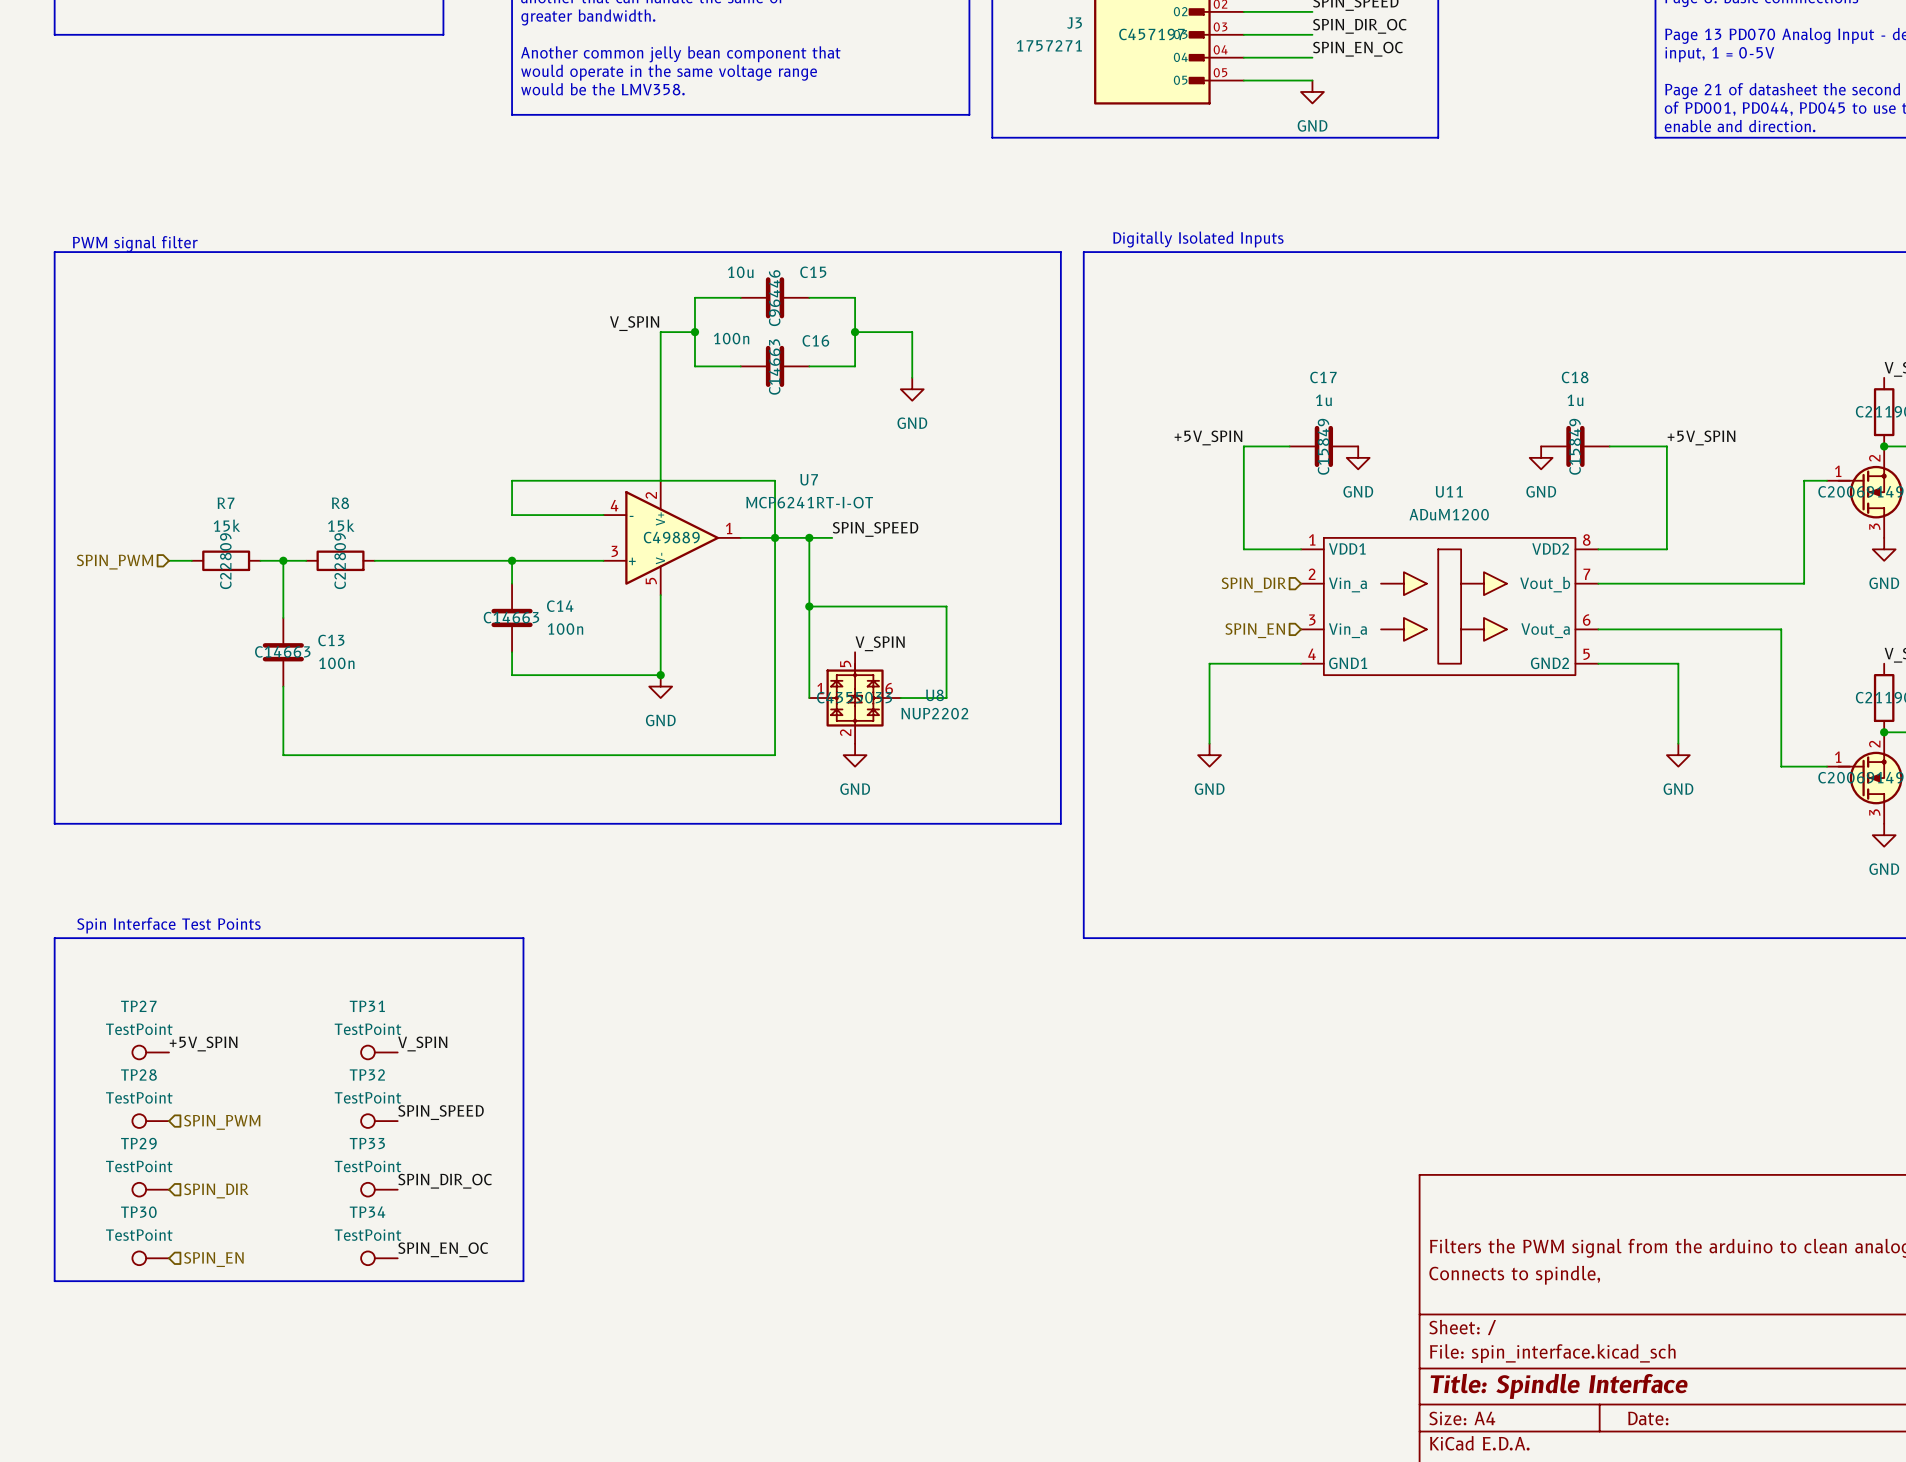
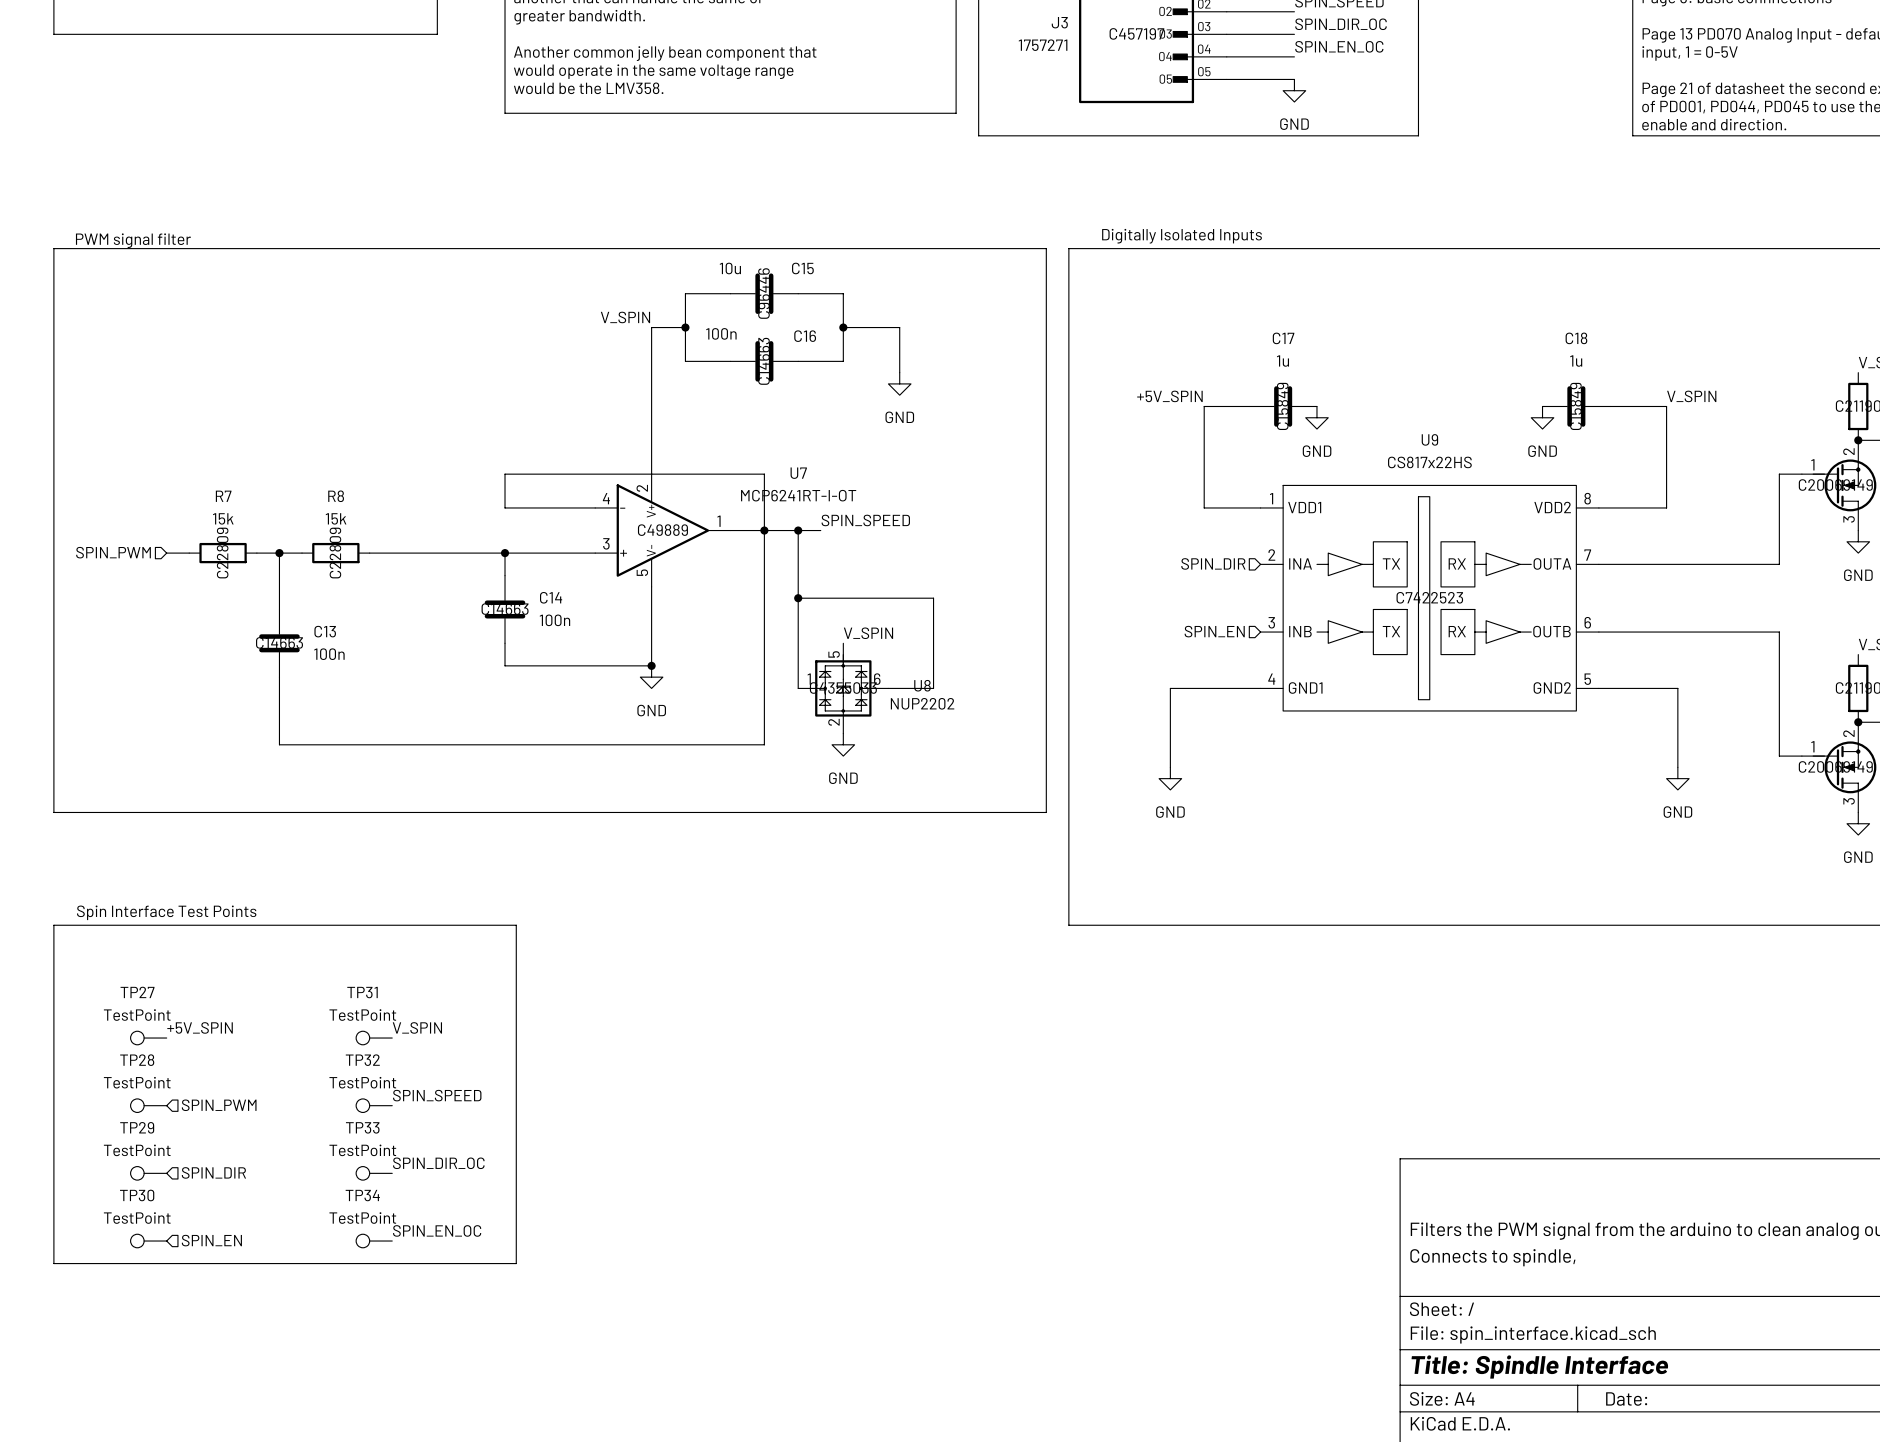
label: none -> V_SPIN (1691, 396)
label position: +5V_SPIN (1208, 437) -> +5V_SPIN (1169, 396)
label: +5V_SPIN (1701, 437) -> none
wire: (1289, 446) (1243, 446) (1243, 549) (1301, 549) -> (1249, 406) (1204, 406) (1204, 507) (1260, 507)
C17 position: (1323, 446) -> (1283, 406)
C18 position: (1575, 446) -> (1576, 406)
wire: (1609, 446) (1666, 446) (1666, 549) (1598, 549) -> (1610, 406) (1666, 406) (1666, 507) (1598, 507)
power symbol position: GND (1358, 457) -> GND (1316, 417)
power symbol position: GND (1541, 457) -> GND (1542, 417)
wire: (1804, 572) (1804, 583) (1598, 583) -> (1779, 564) (1598, 564)
hierarchical label position: SPIN_DIR (1253, 584) -> SPIN_DIR (1213, 563)
U11: ADuM1200 (1449, 606) -> none
U9: none -> CS817x22HS (1429, 598)
wire: (1598, 629) (1781, 629) (1781, 766) (1804, 766) -> (1598, 632) (1779, 632) (1779, 756)
hierarchical label position: SPIN_EN (1255, 630) -> SPIN_EN (1214, 631)
wire: (1301, 663) (1209, 663) (1209, 743) -> (1260, 688) (1170, 688) (1170, 767)
wire: (1598, 663) (1678, 663) (1678, 743) -> (1598, 688) (1677, 688) (1677, 767)
power symbol position: GND (1209, 755) -> GND (1170, 778)
power symbol position: GND (1678, 755) -> GND (1677, 778)

